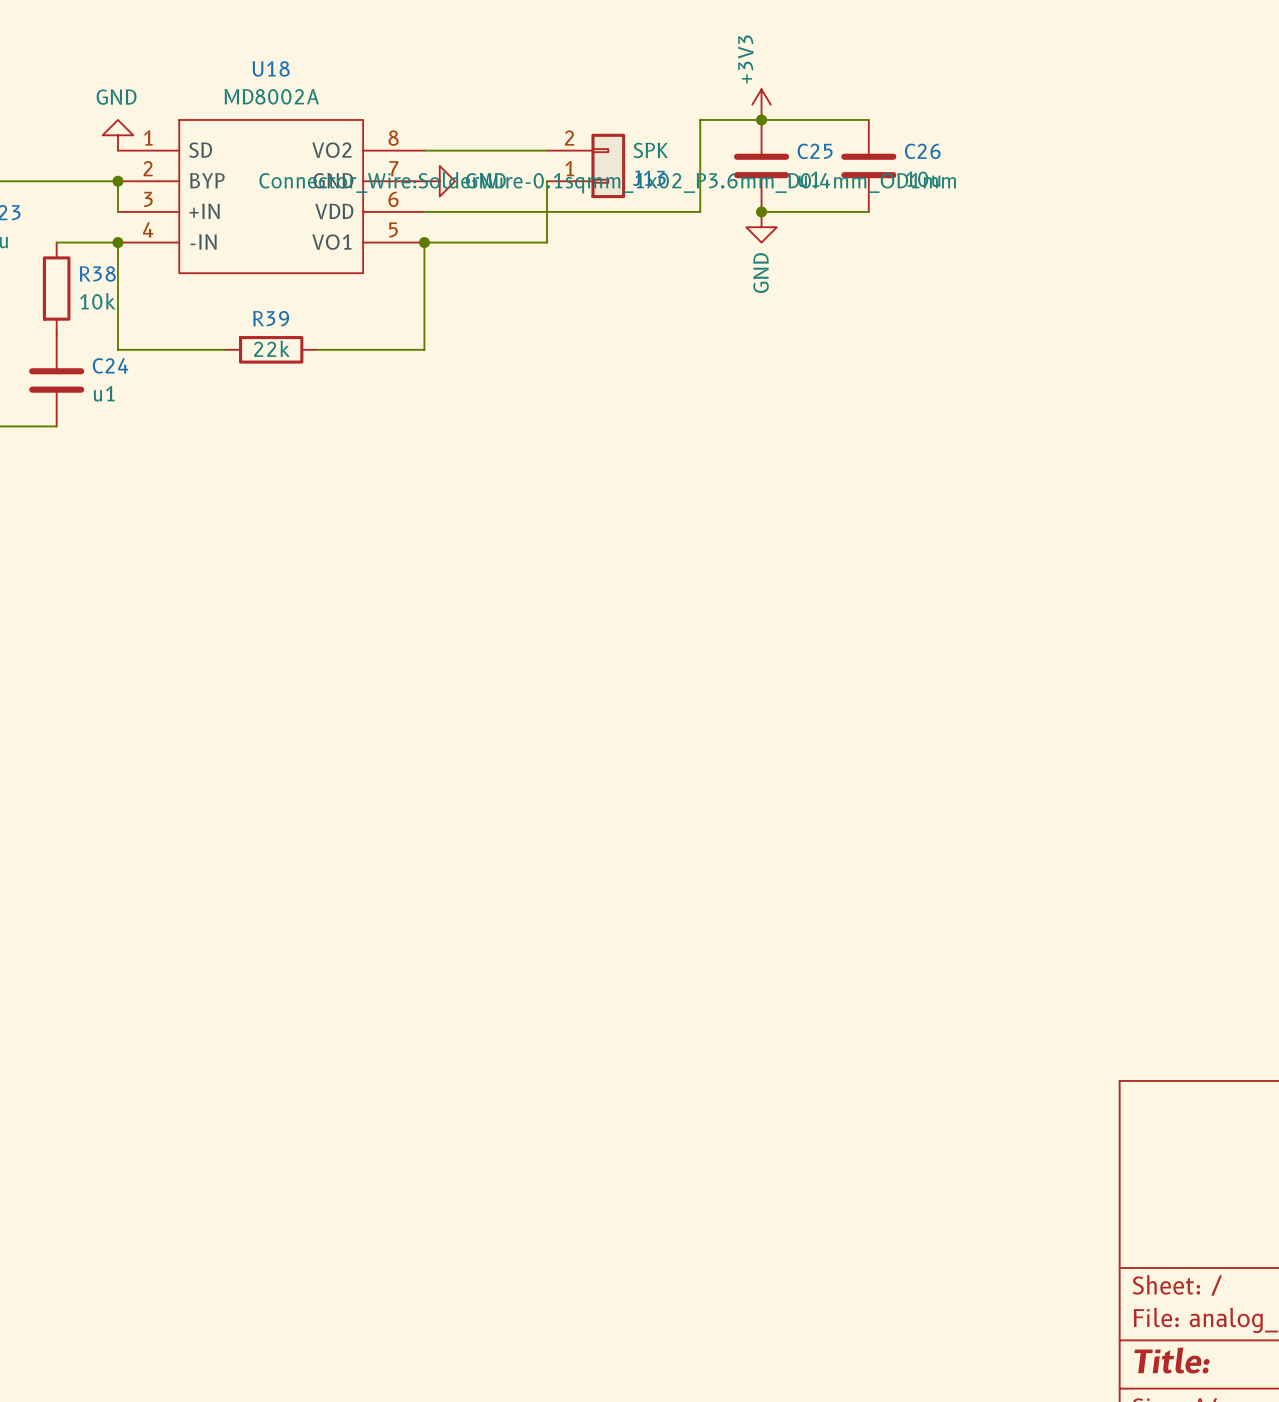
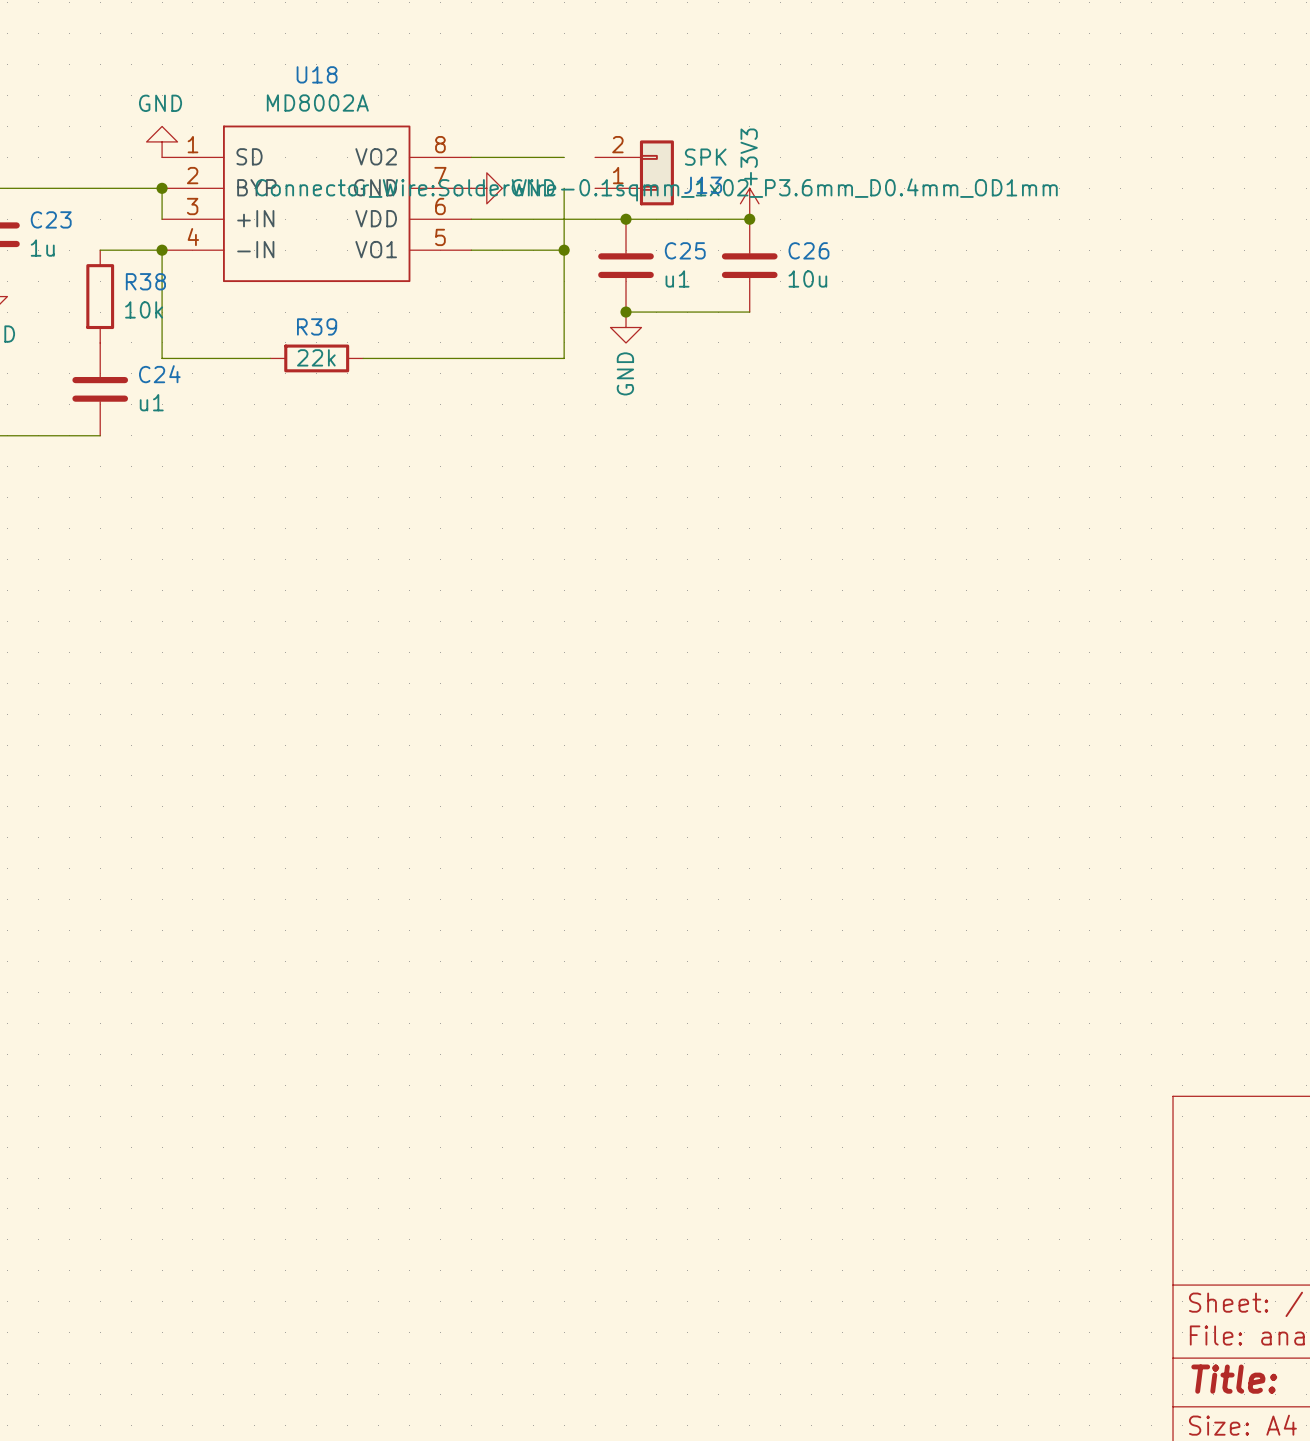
power symbol text position: +3V3 (745, 59) -> +3V3 (749, 157)
power symbol position: +3V3 (761, 104) -> +3V3 (749, 203)
junction: (761, 119) -> none
wire: (868, 119) (700, 119) (700, 211) -> none
wire: (516, 150) (547, 150) -> none
C25 position: (761, 165) -> (626, 265)
C26 position: (868, 165) -> (749, 265)
wire: (547, 181) (547, 242) (516, 242) -> none
junction: none -> (626, 219)
junction: none -> (749, 219)
wire: (761, 211) (868, 211) -> none
junction: (761, 211) -> none
power symbol position: GND (761, 227) -> GND (626, 327)
wire: (424, 242) (424, 349) -> (564, 188) (564, 358) (471, 358)
junction: (424, 242) -> none
junction: none -> (564, 250)
wire: none -> (626, 312) (749, 312)
junction: none -> (626, 312)

